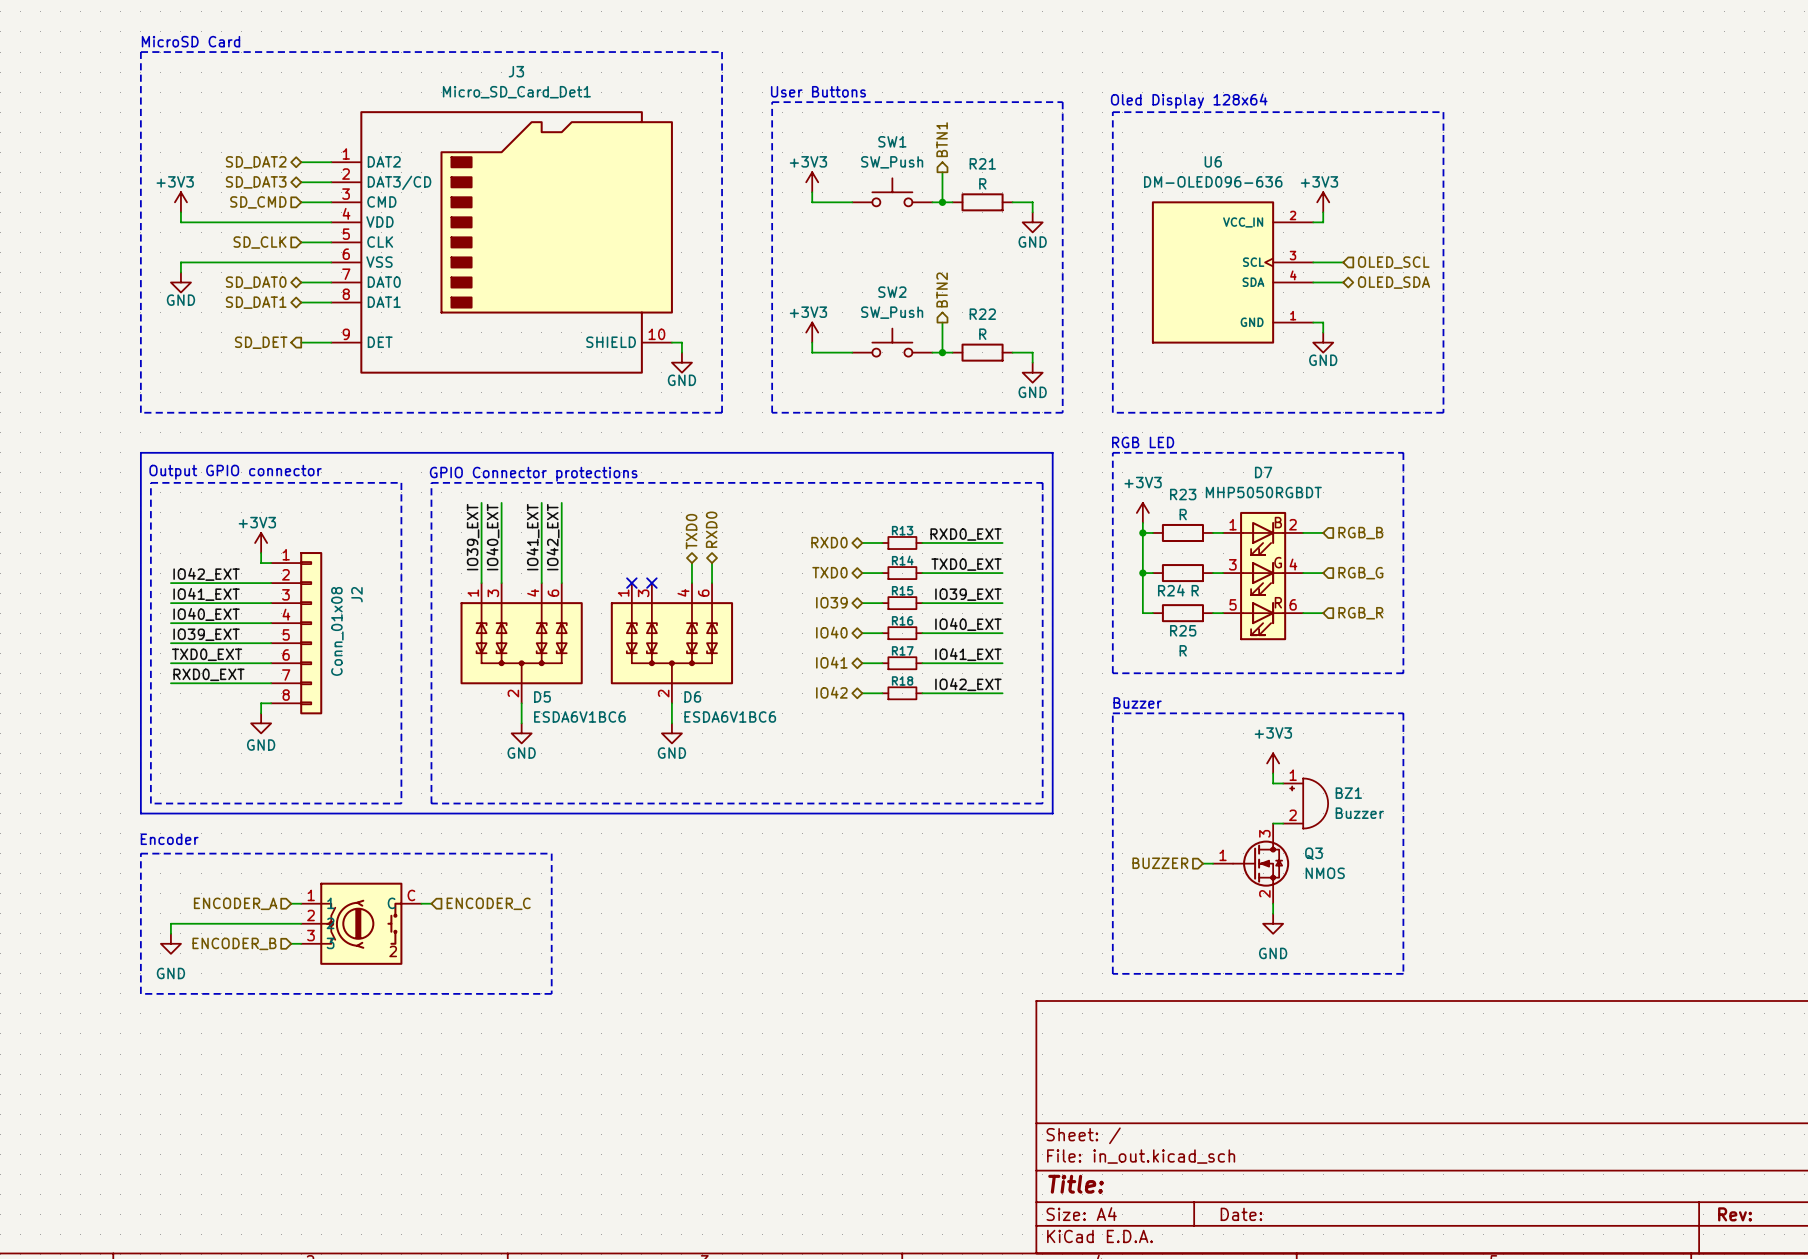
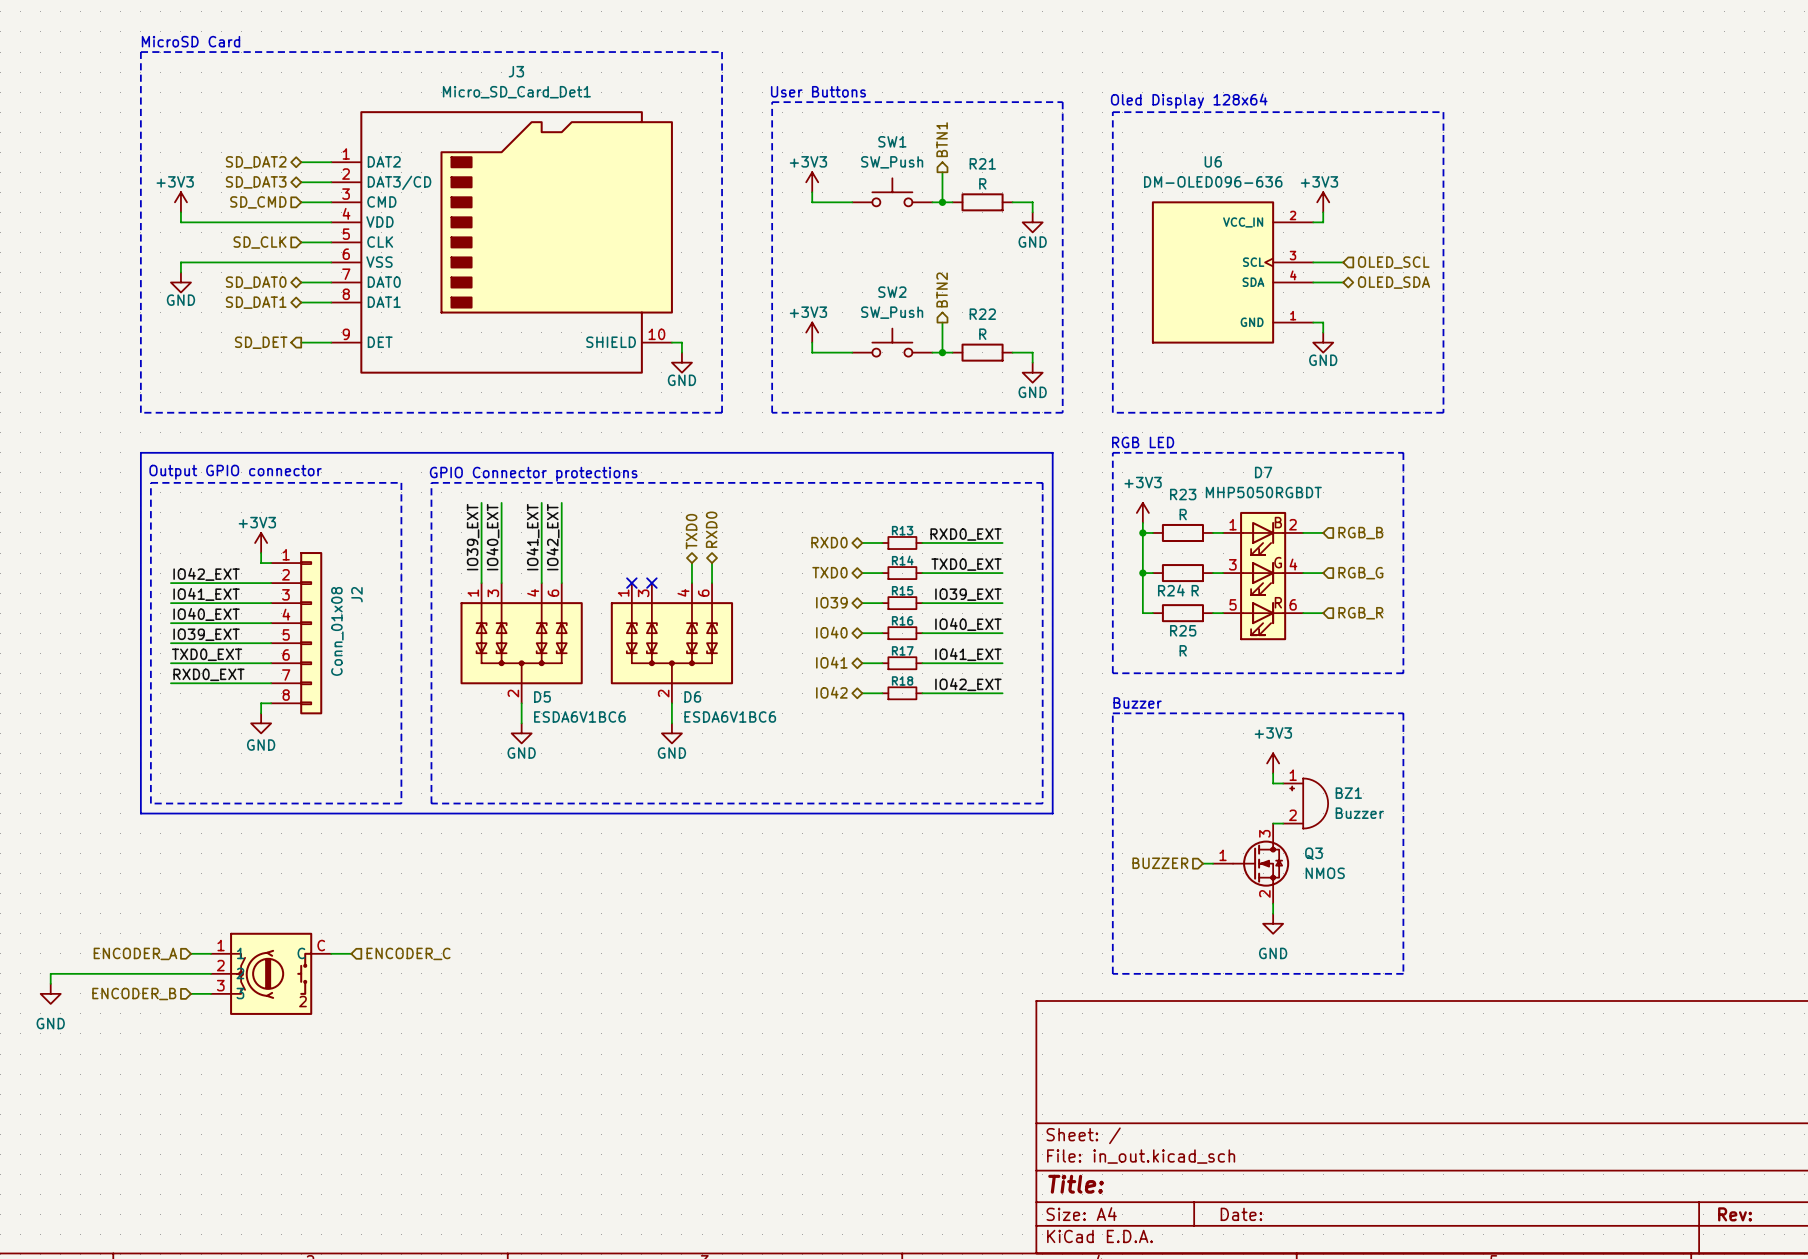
text: Encoder (169, 839) -> none
line: (140, 853) (551, 853) (551, 993) (140, 993) (140, 853) -> none
hierarchical label position: ENCODER_A (235, 903) -> ENCODER_A (135, 953)
wire: (291, 903) (301, 903) -> none
wire: (421, 903) (431, 903) -> none
hierarchical label position: ENCODER_C (488, 903) -> ENCODER_C (408, 953)
wire: (301, 923) (170, 923) (170, 933) -> none
part position: (361, 923) -> (271, 973)
power symbol position: GND (170, 943) -> GND (50, 993)
hierarchical label position: ENCODER_B (234, 943) -> ENCODER_B (134, 994)
wire: none -> (190, 953) (211, 953)
wire: none -> (211, 973) (50, 973) (50, 983)

